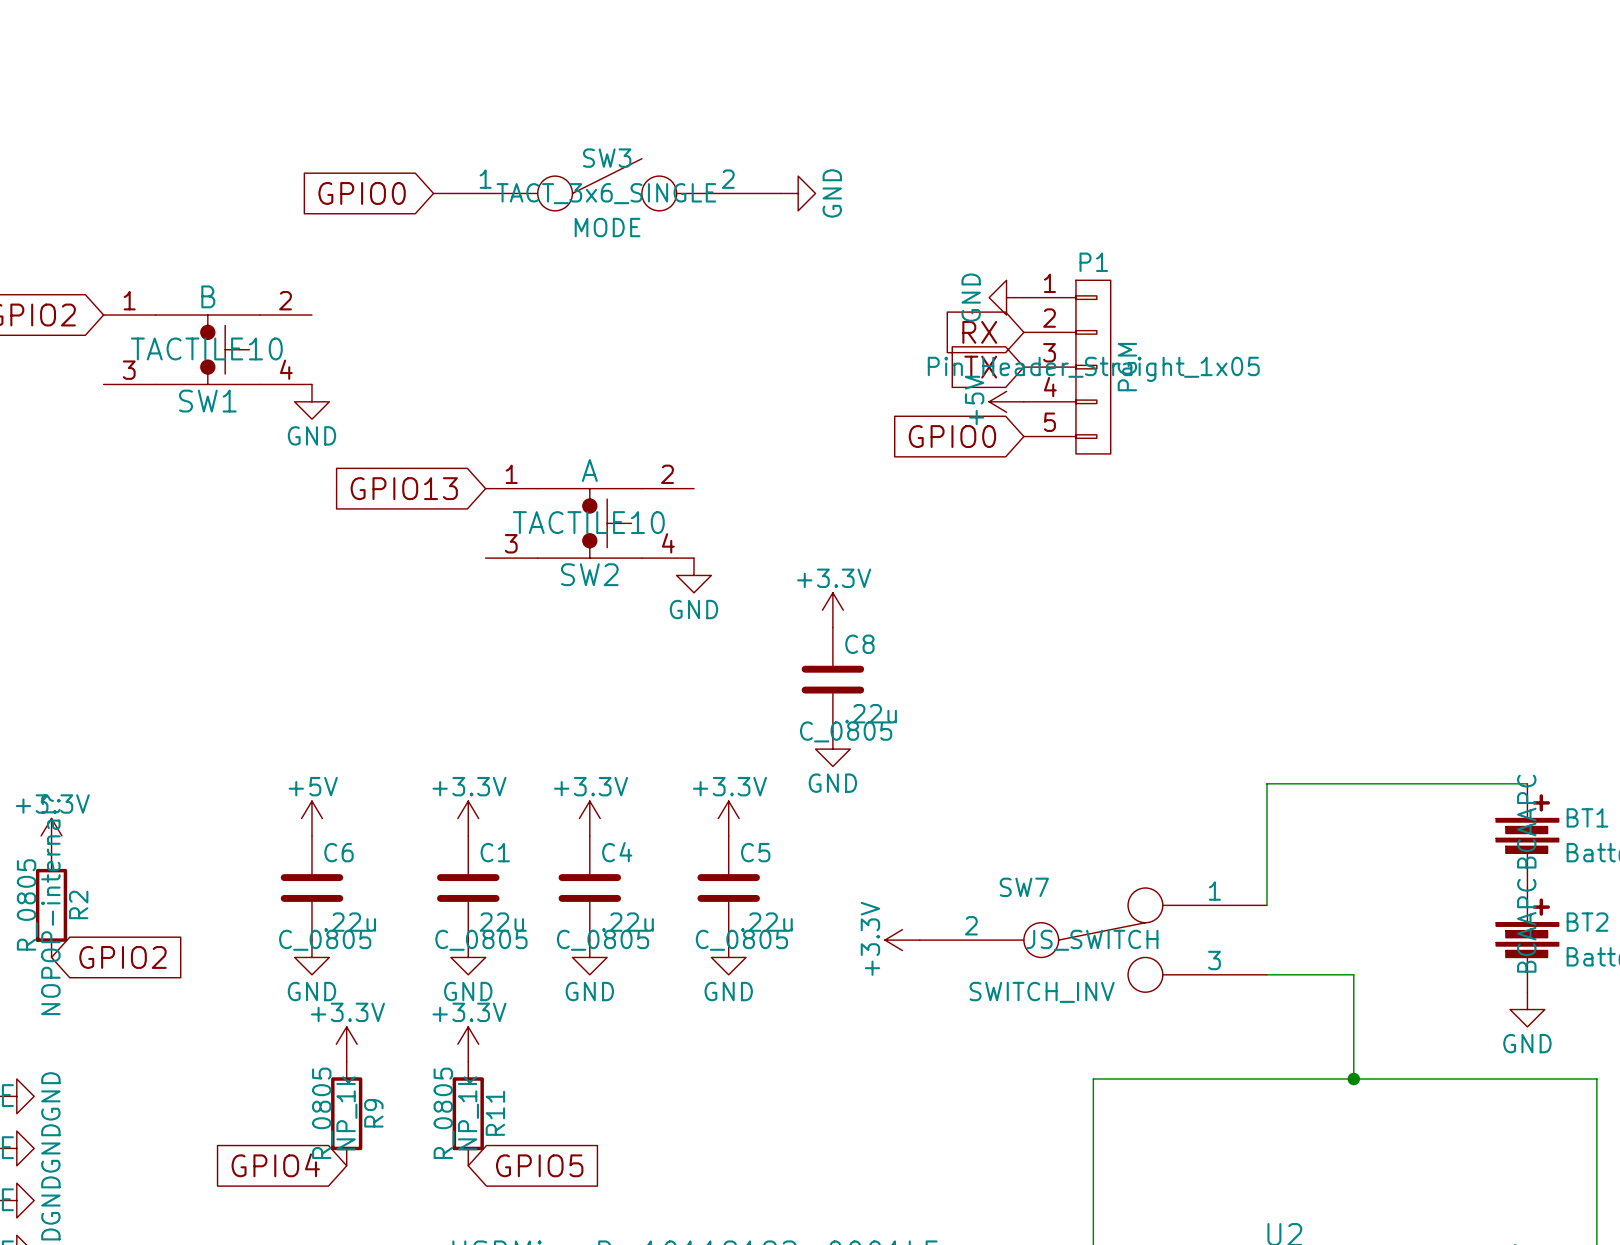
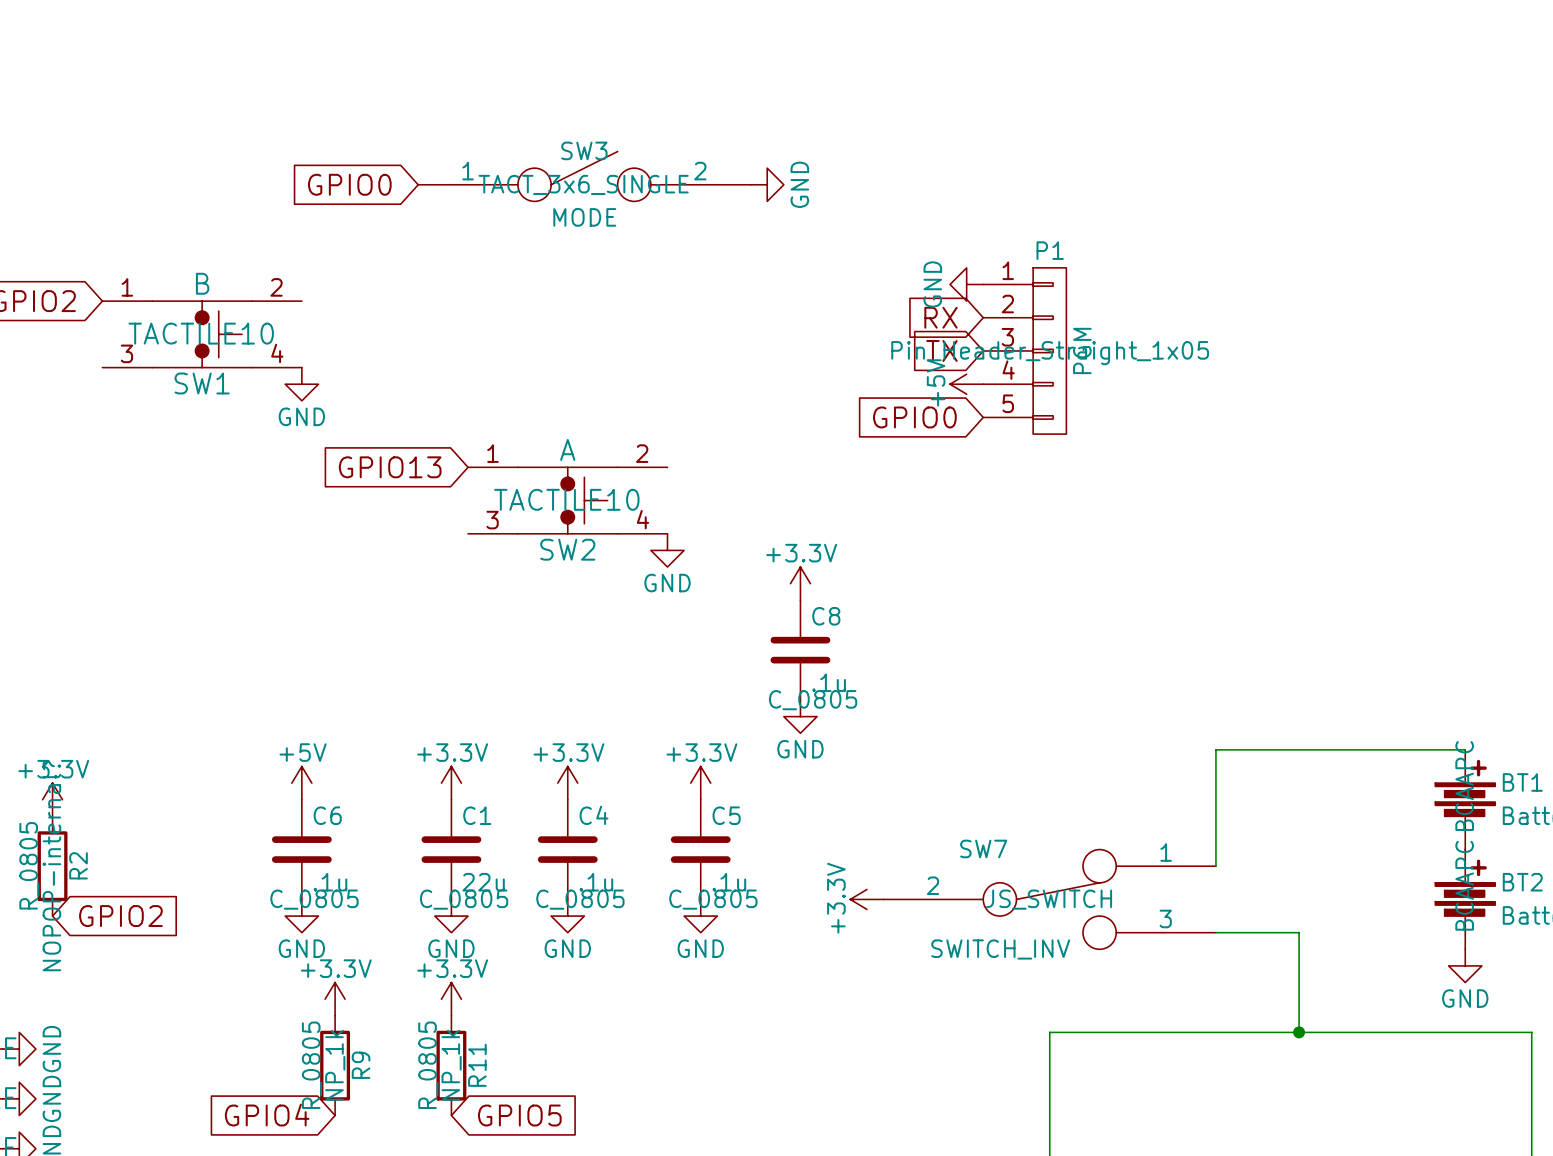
C8 value: .22u (871, 713) -> .1u (829, 682)
C6 value: .22u (350, 922) -> .1u (330, 882)
C4 value: .22u (627, 922) -> .1u (596, 882)
C5 value: .22u (766, 922) -> .1u (729, 882)

